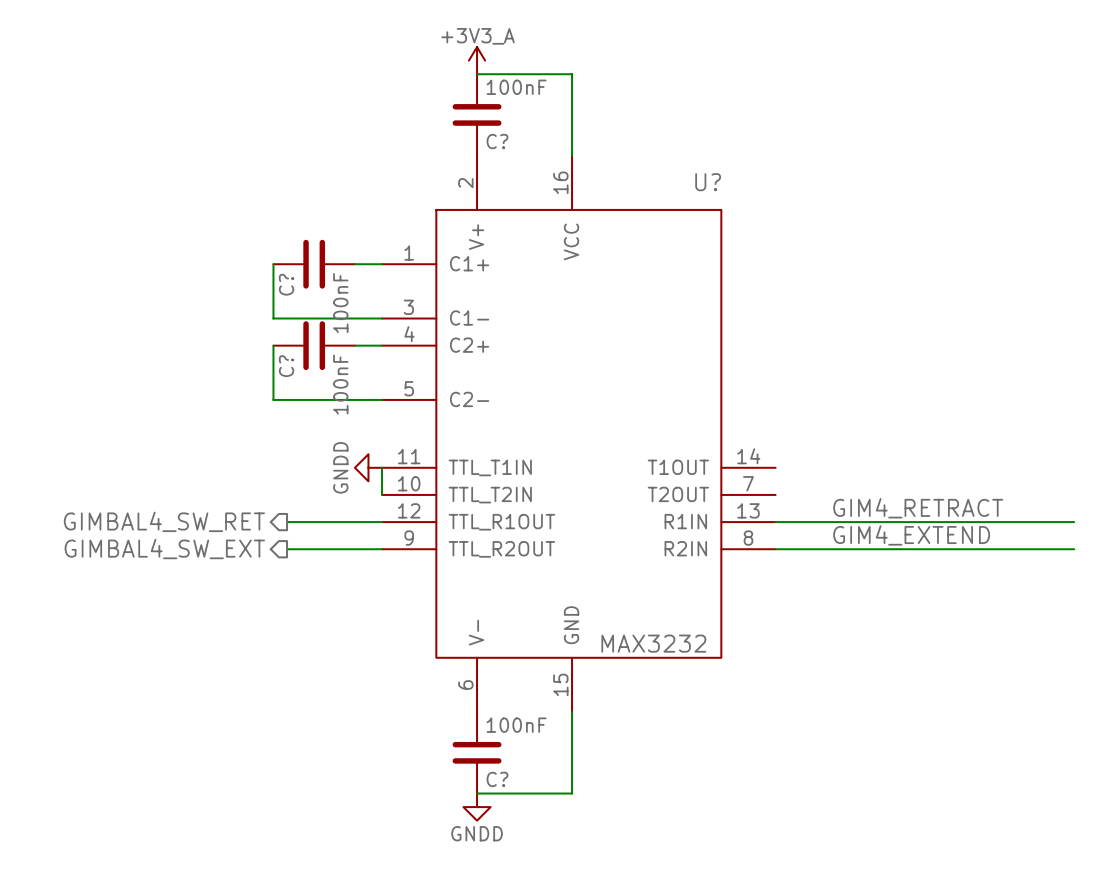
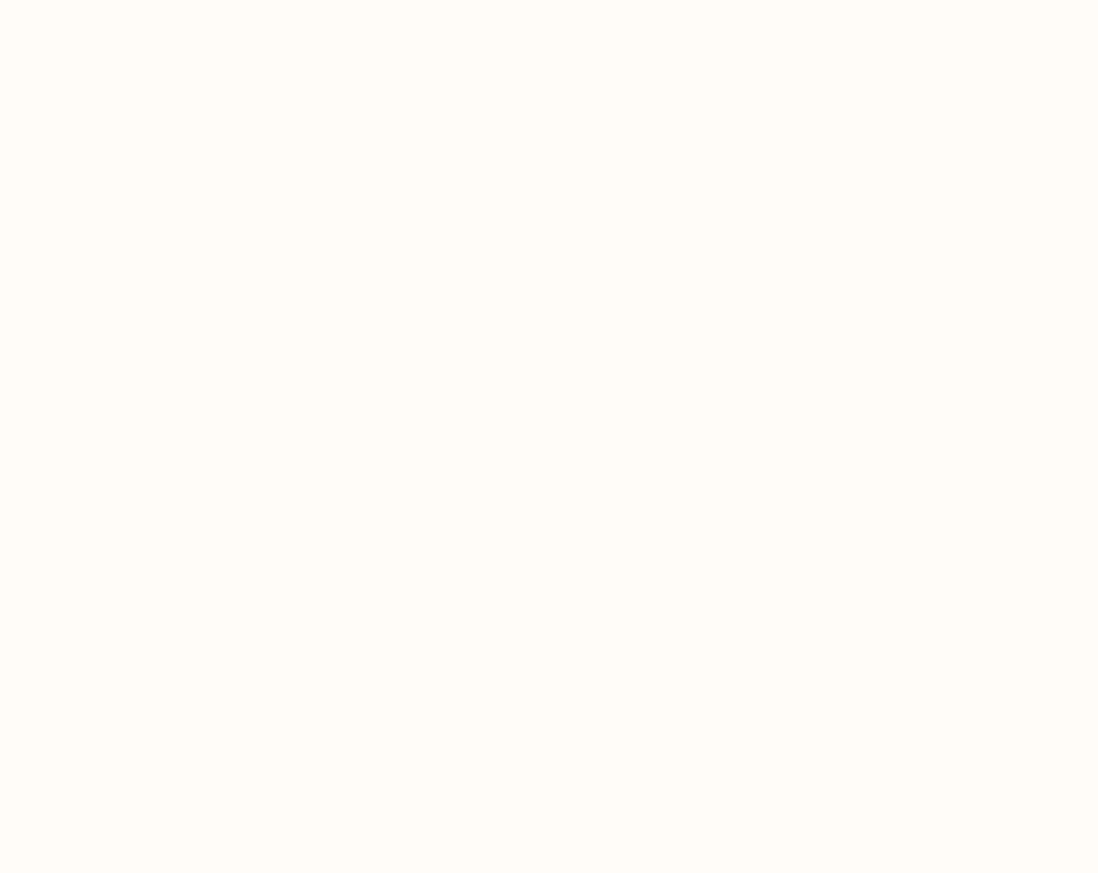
power symbol: +3V3_A (477, 60) -> none
wire: (477, 74) (572, 74) (572, 155) -> none
C?: 100nF (477, 114) -> none
wire: (273, 264) (273, 318) (382, 318) -> none
C?: 100nF (314, 264) -> none
wire: (354, 264) (382, 264) -> none
wire: (273, 345) (273, 399) (382, 399) -> none
C?: 100nF (314, 345) -> none
wire: (354, 345) (382, 345) -> none
U?: MAX3232 (578, 433) -> none
power symbol: GNDD (368, 467) -> none
wire: (382, 467) (382, 494) -> none
label: GIM4_RETRACT (918, 508) -> none
hierarchical label: GIMBAL4_SW_RET (164, 521) -> none
wire: (287, 522) (382, 522) -> none
wire: (775, 522) (1074, 522) -> none
label: GIM4_EXTEND (911, 535) -> none
hierarchical label: GIMBAL4_SW_EXT (164, 549) -> none
wire: (287, 549) (382, 549) -> none
wire: (775, 549) (1074, 549) -> none
wire: (572, 712) (572, 793) (477, 793) -> none
C?: 100nF (477, 752) -> none
power symbol: GNDD (477, 807) -> none

